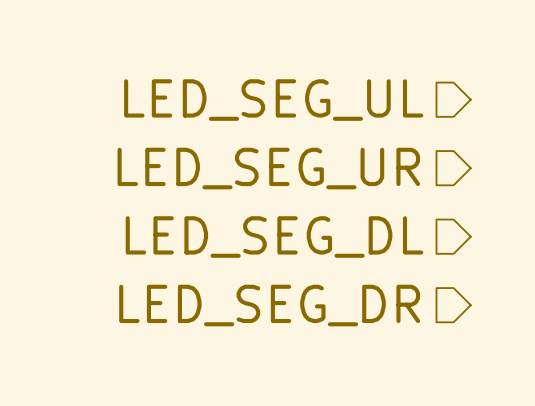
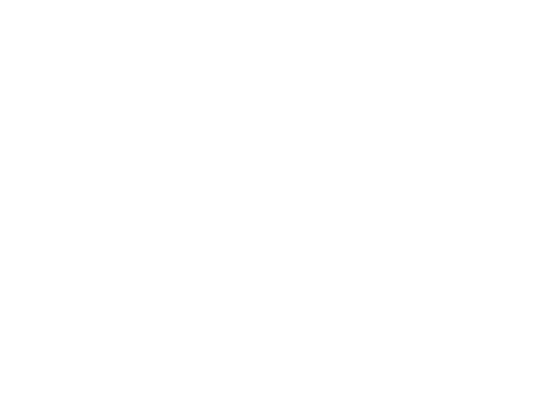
hierarchical label: LED_SEG_UL (273, 100) -> none
hierarchical label: LED_SEG_UR (268, 168) -> none
hierarchical label: LED_SEG_DL (274, 237) -> none
hierarchical label: LED_SEG_DR (269, 305) -> none

